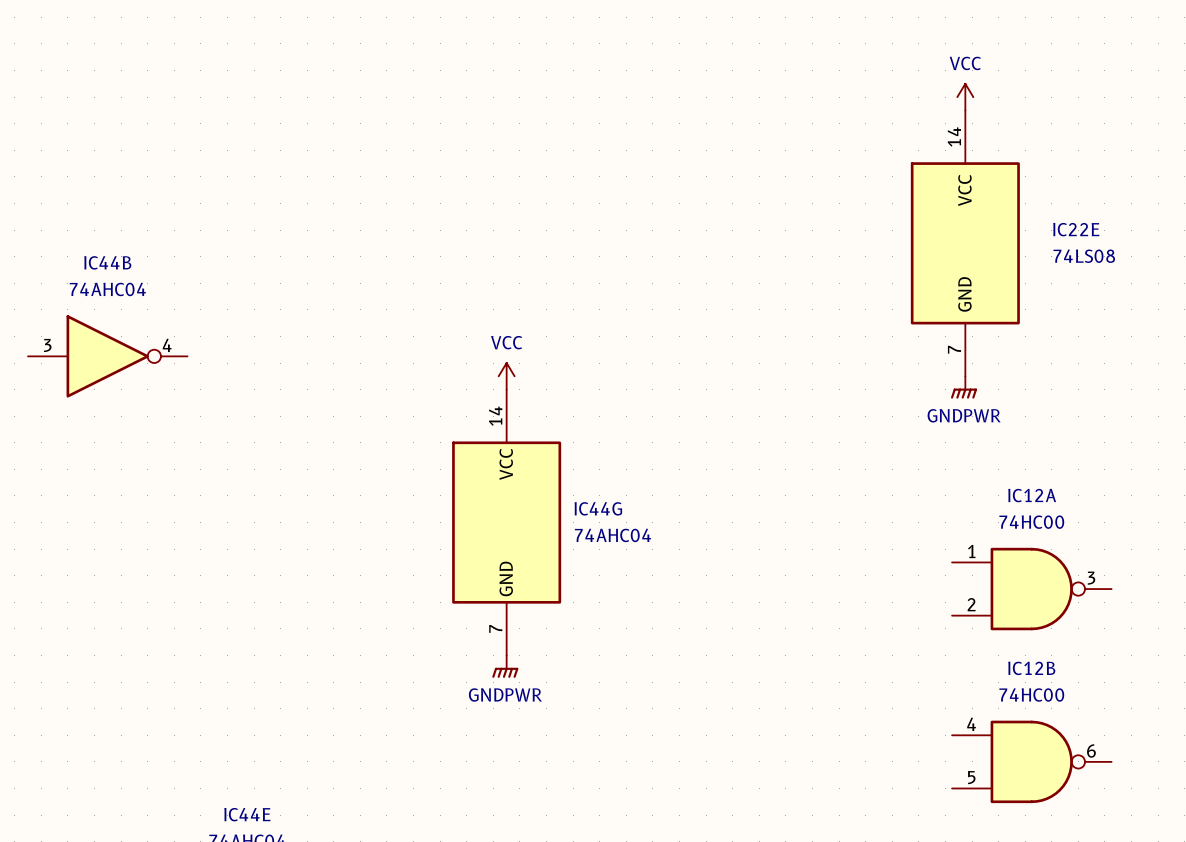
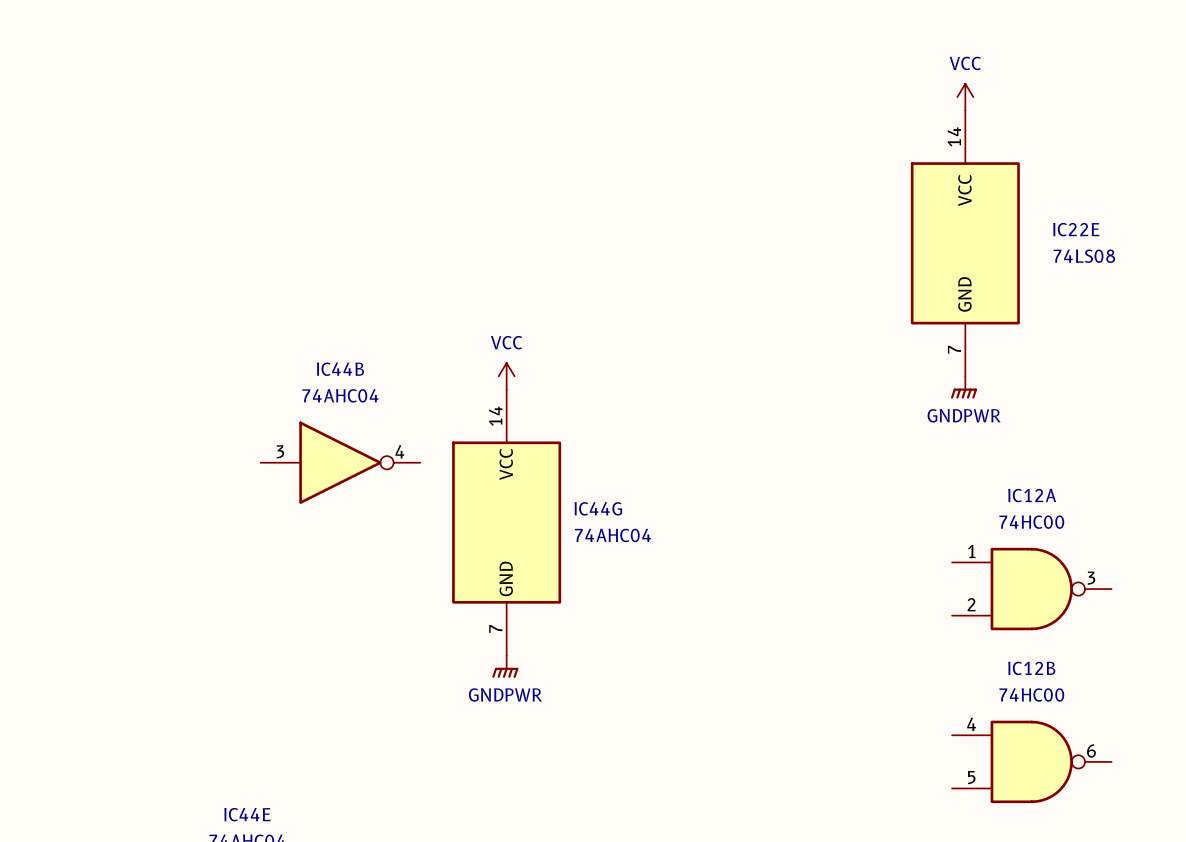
IC44B position: (107, 356) -> (340, 462)

